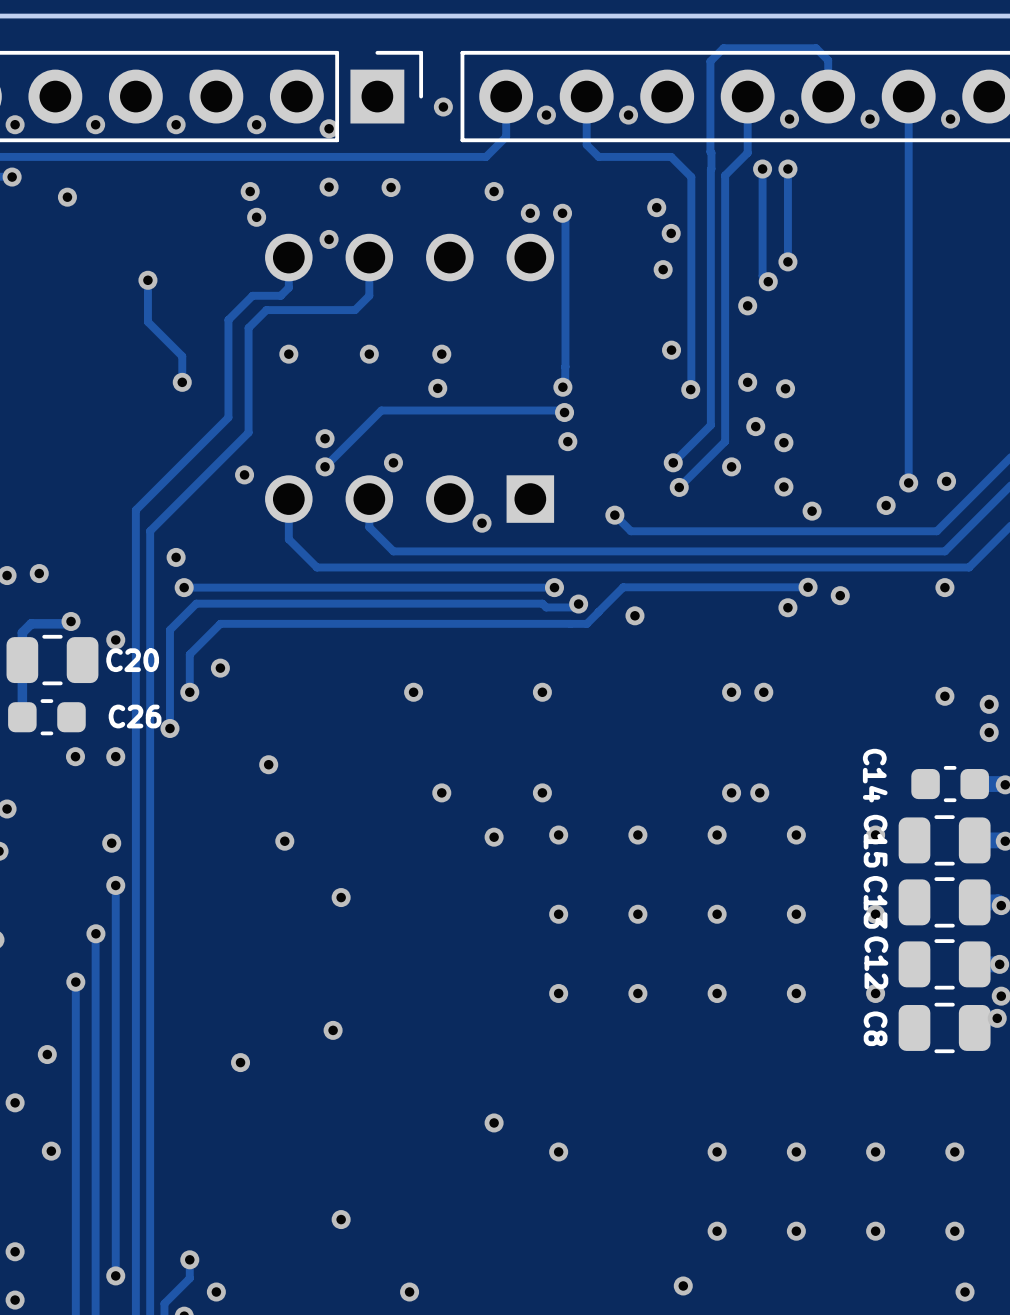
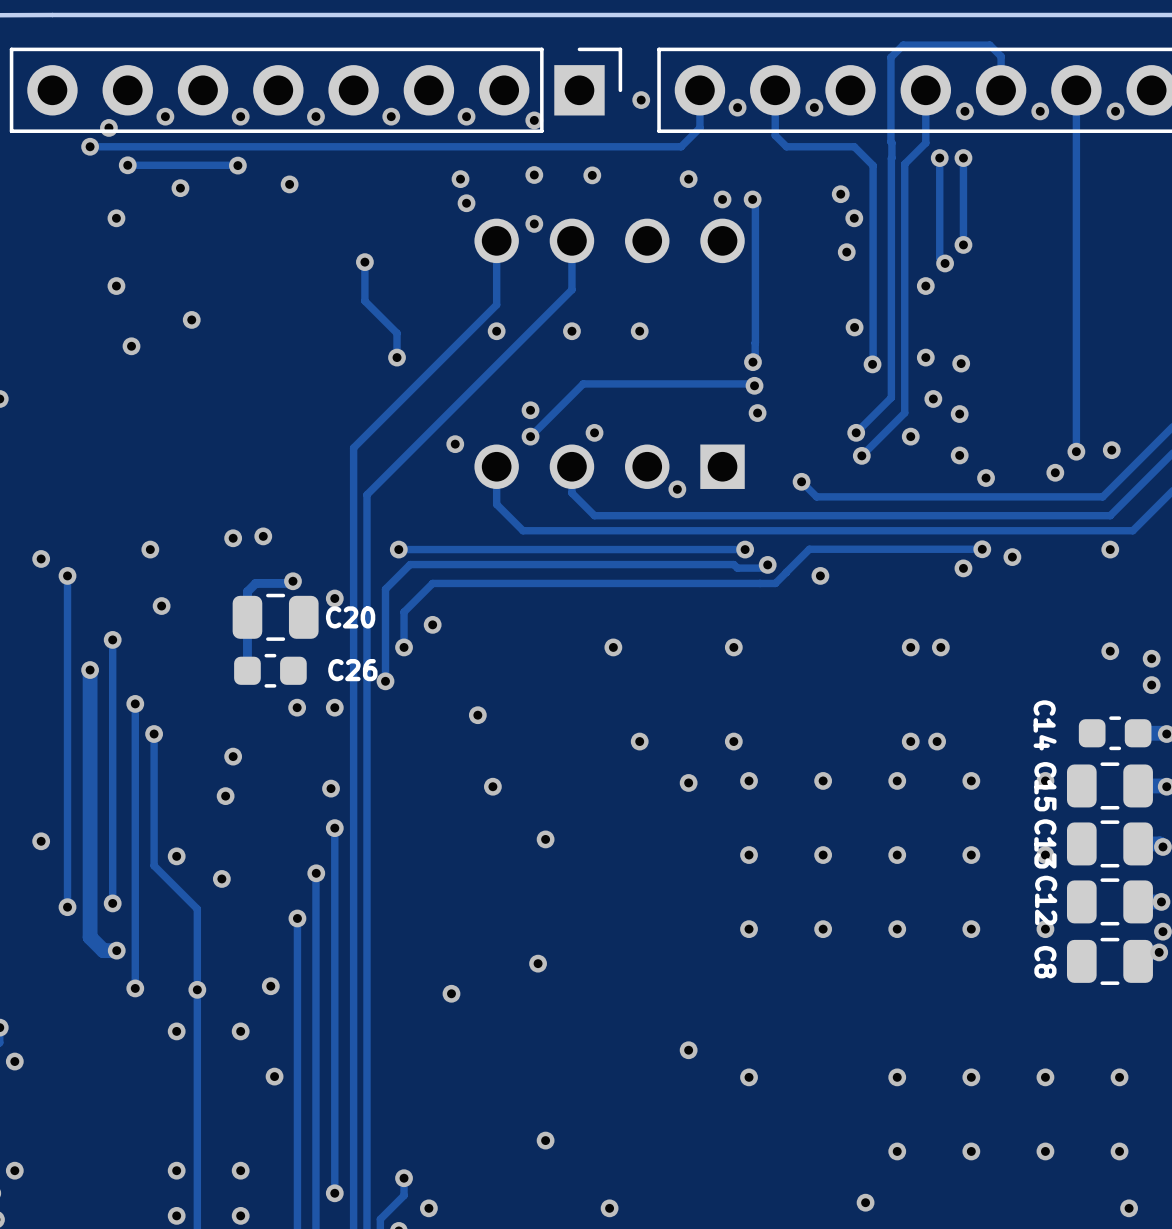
track: (288, 287) (280, 295) (252, 295) (228, 319) (228, 417) (135, 510) -> (496, 269) (496, 304) (353, 447) (353, 477)
track: (369, 295) (355, 310) (266, 310) (248, 328) (248, 432) (150, 531) -> (571, 276) (571, 289) (366, 496)
via: (437, 388) -> none
via: (176, 557) -> none

